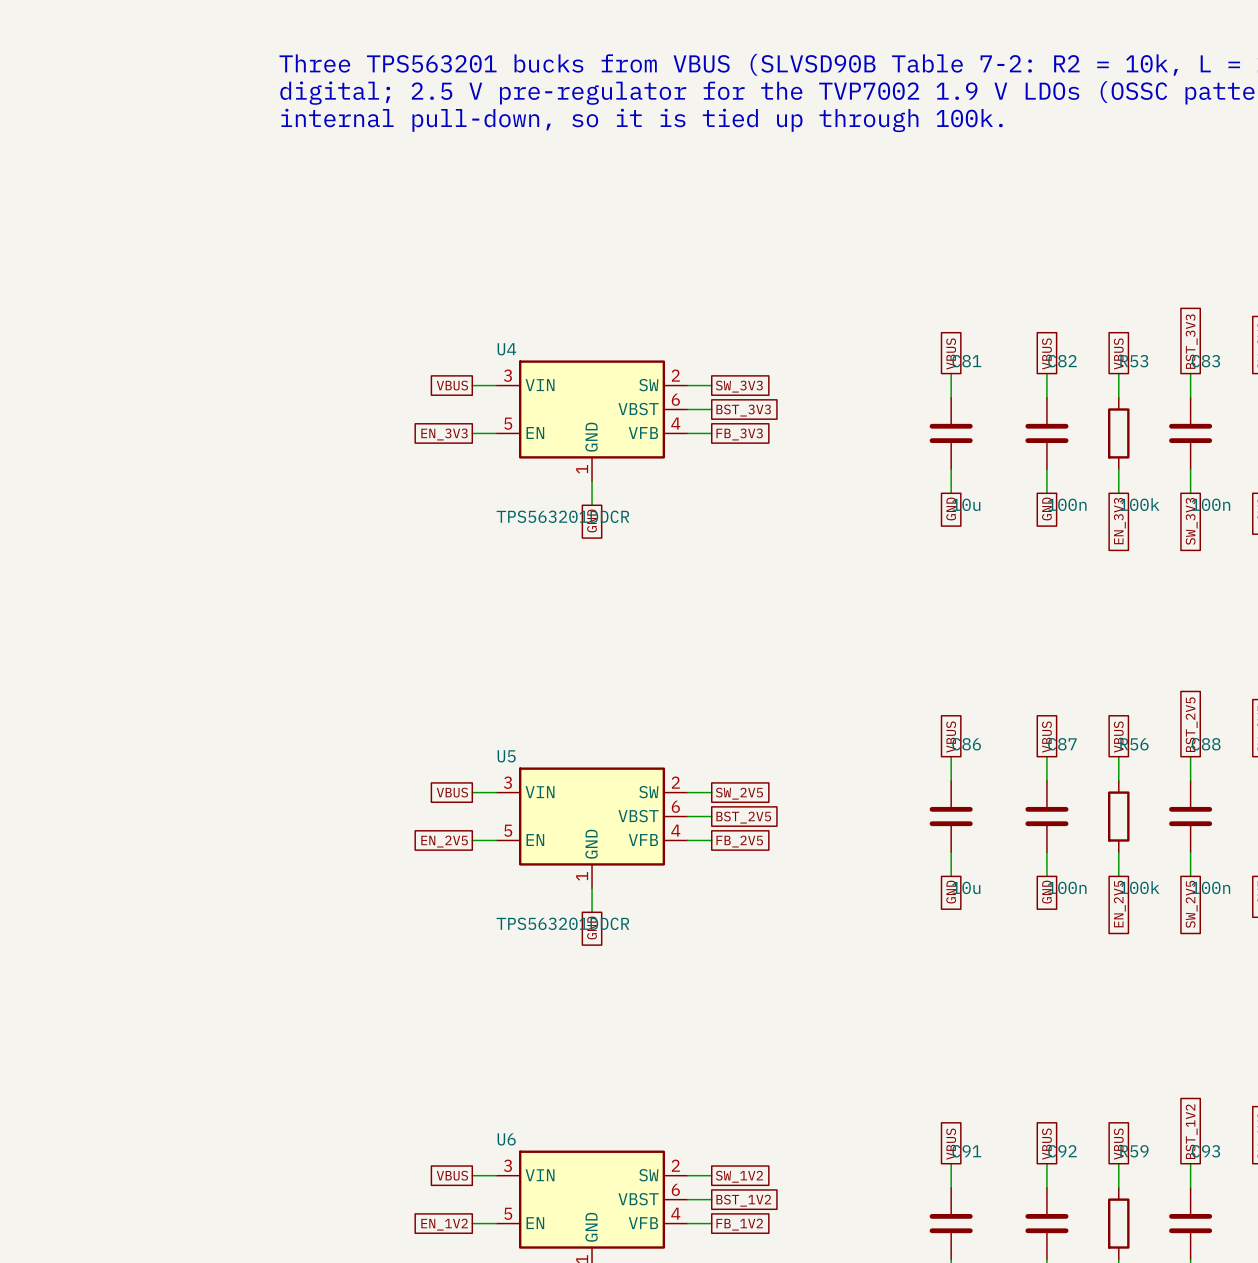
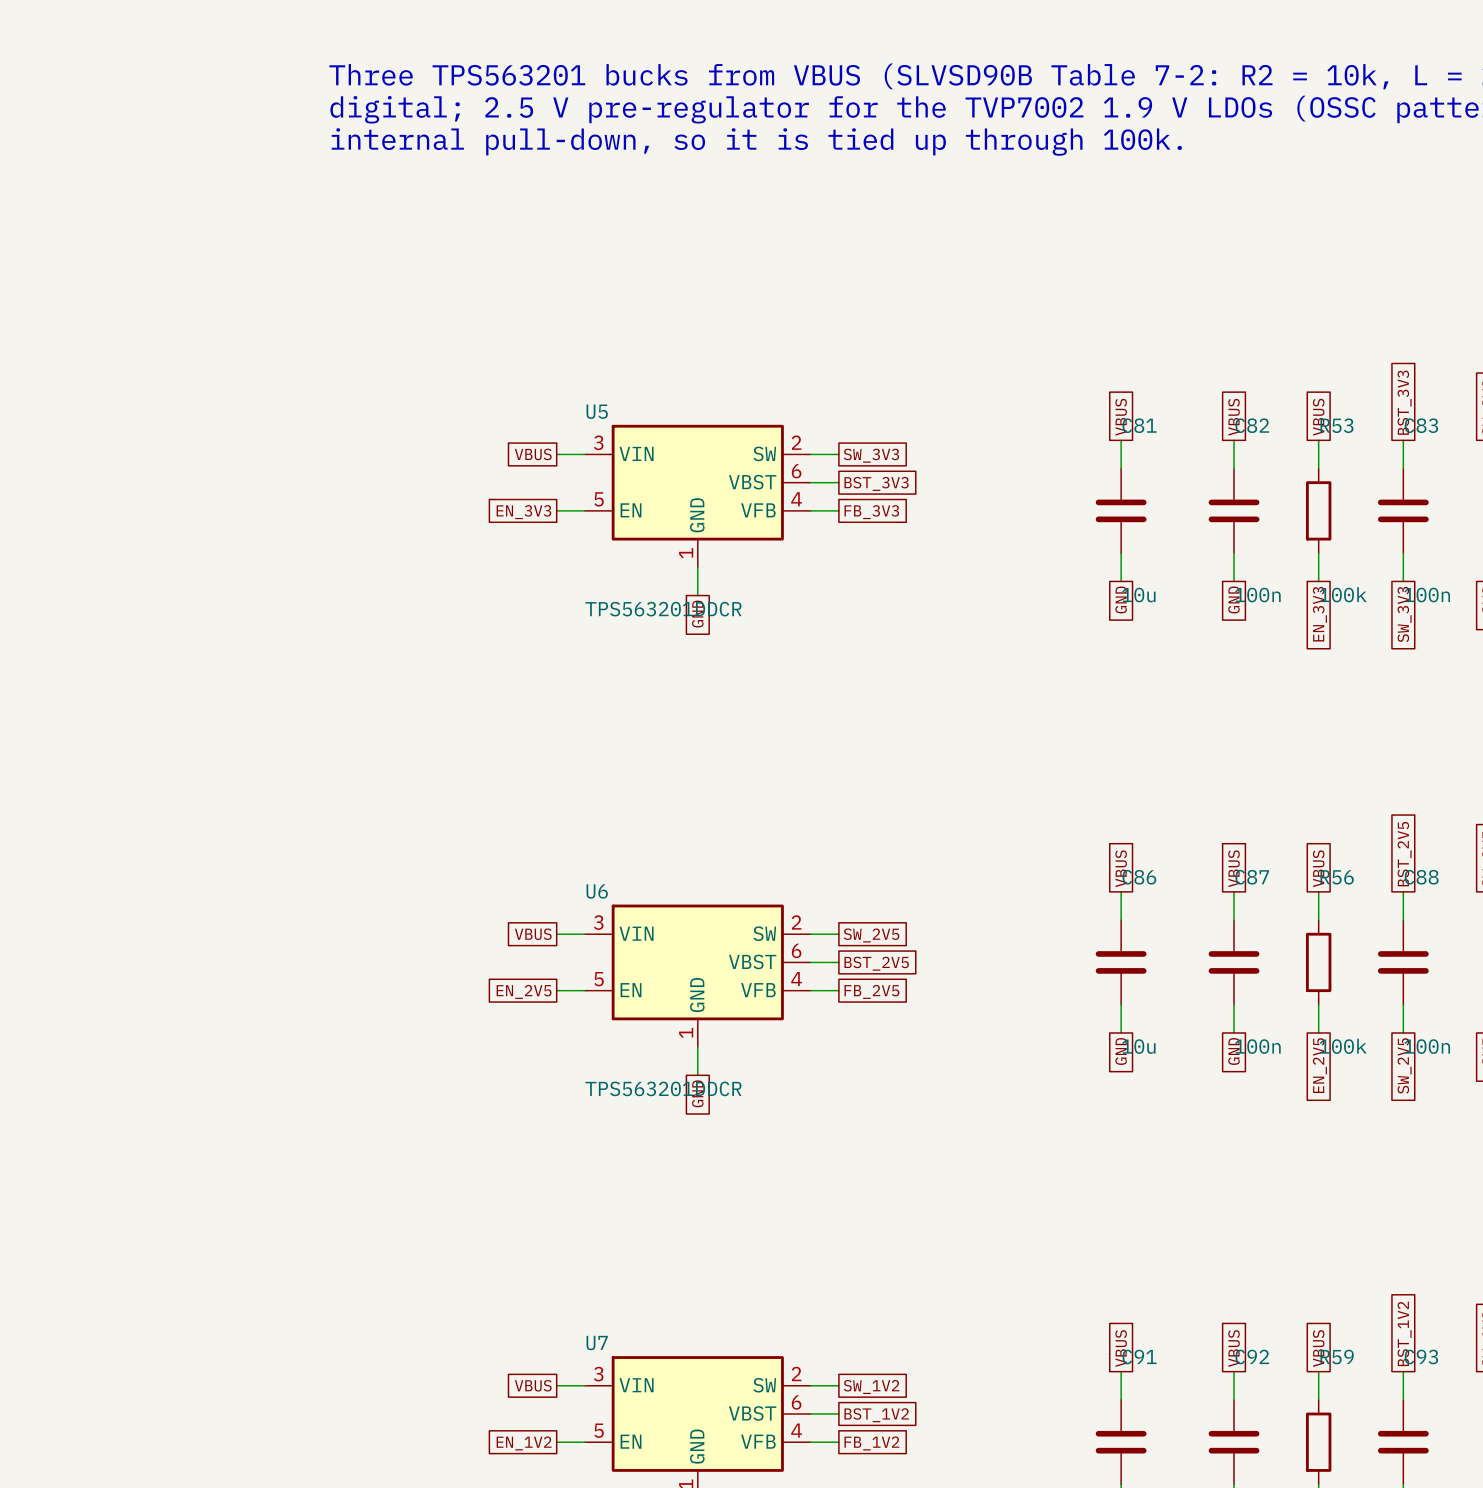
U4 name: U4 (506, 349) -> U5 (597, 411)
U5 name: U5 (506, 756) -> U6 (597, 891)
U6 name: U6 (506, 1139) -> U7 (597, 1343)

